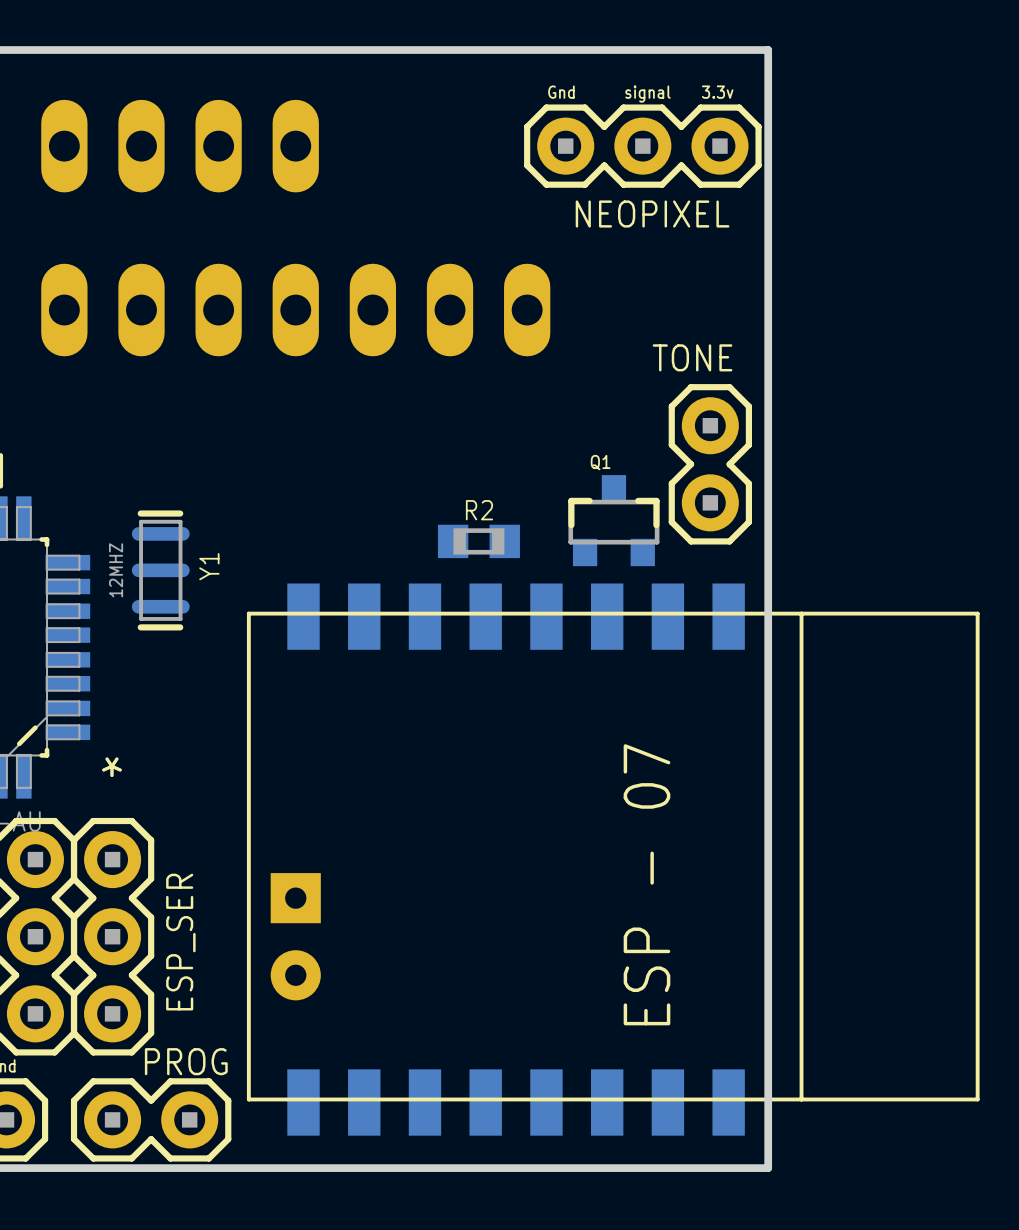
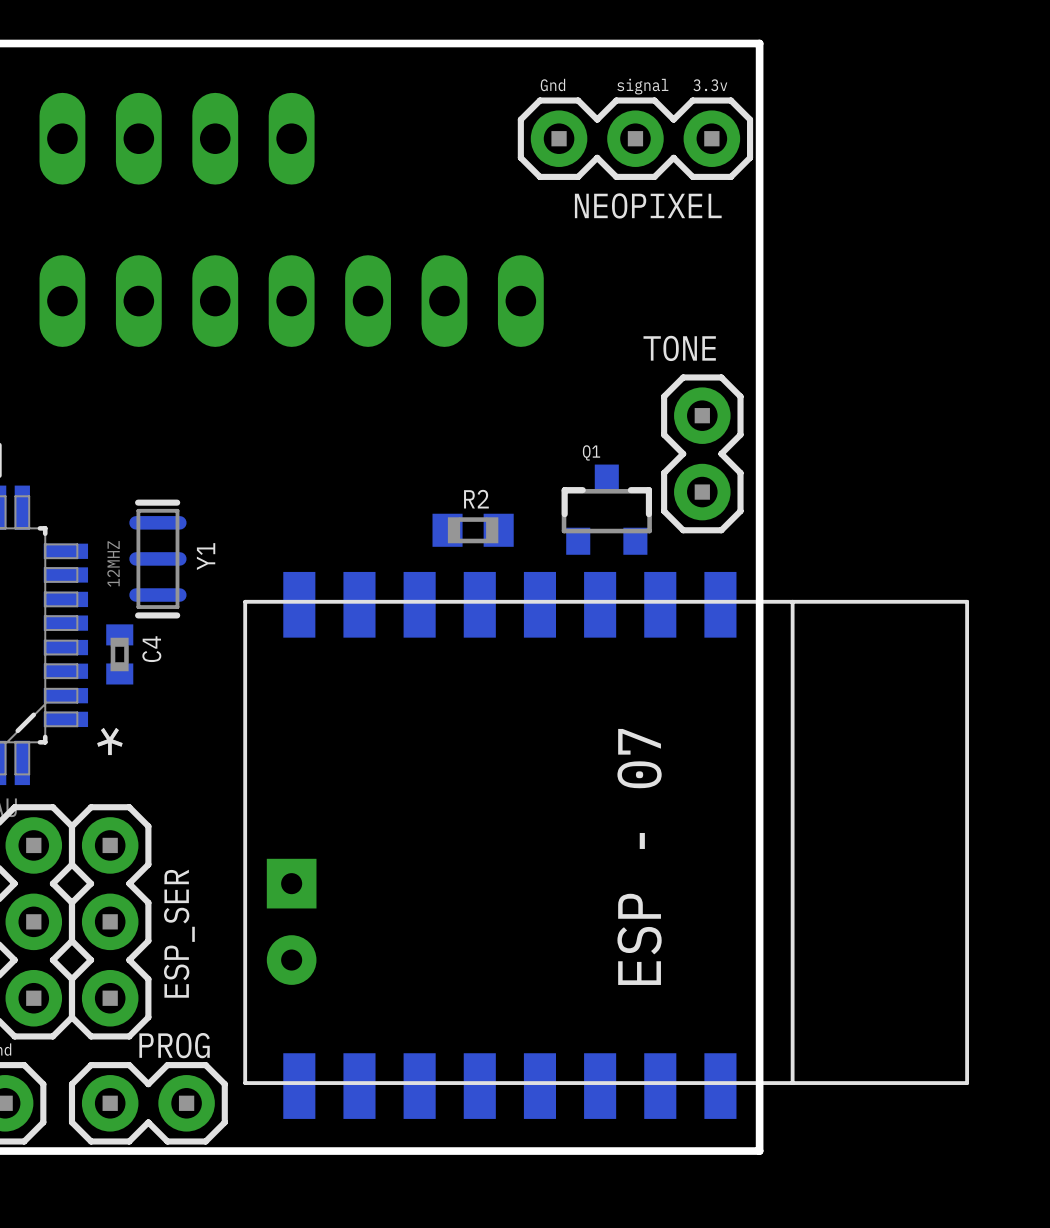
C4: none -> (119, 654)

